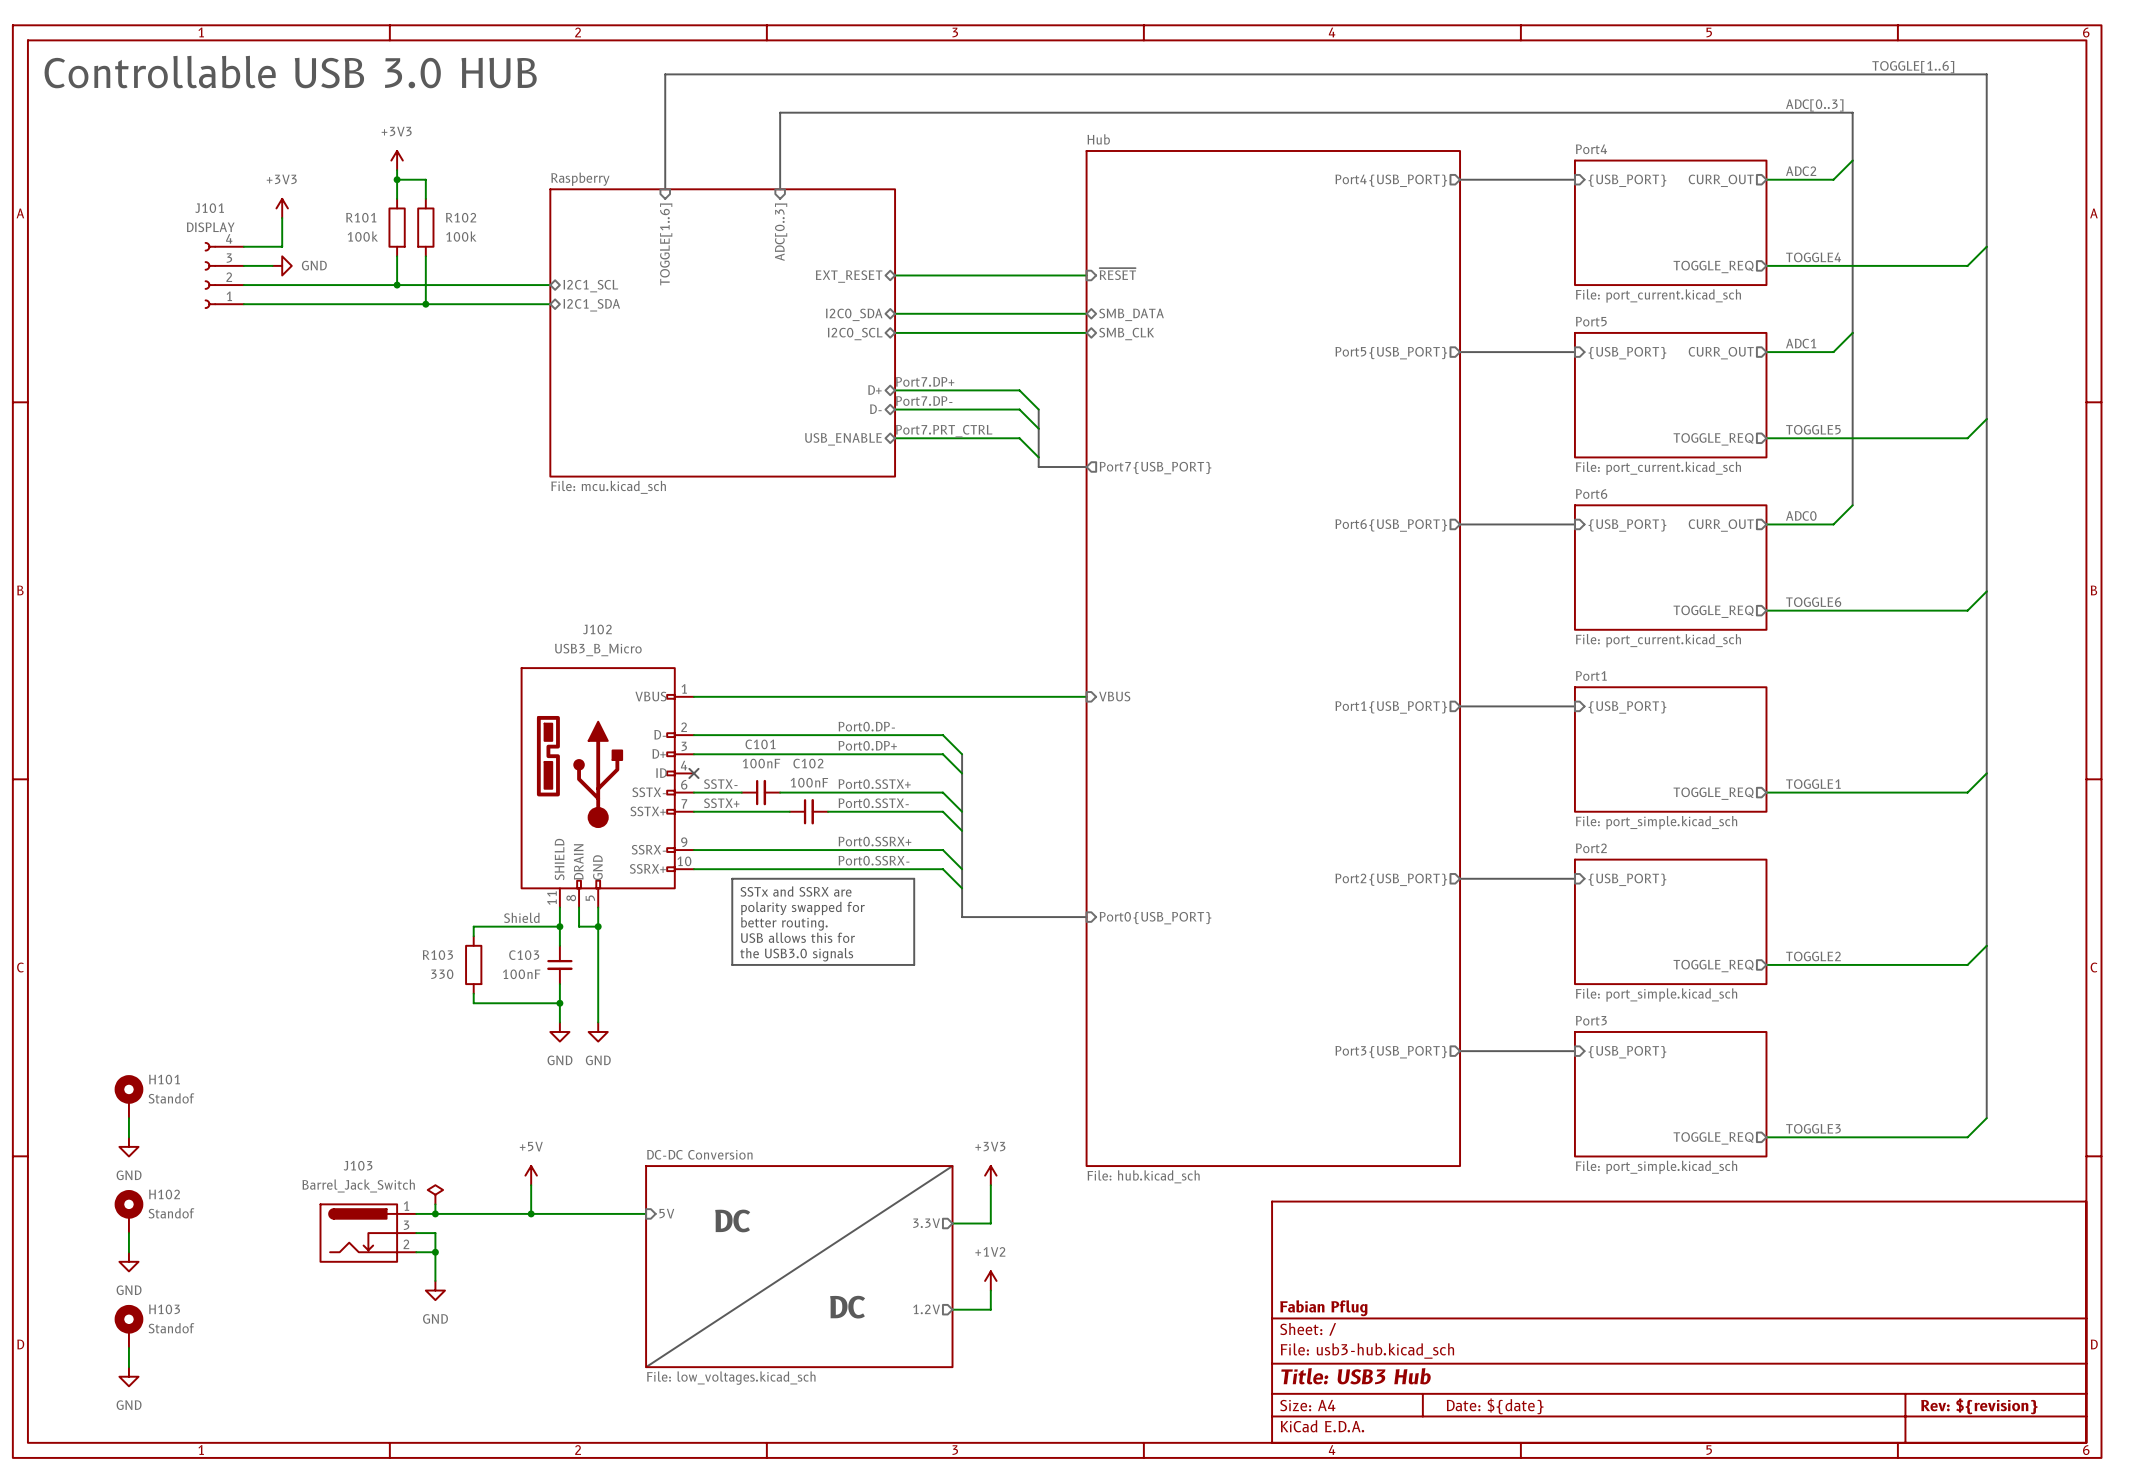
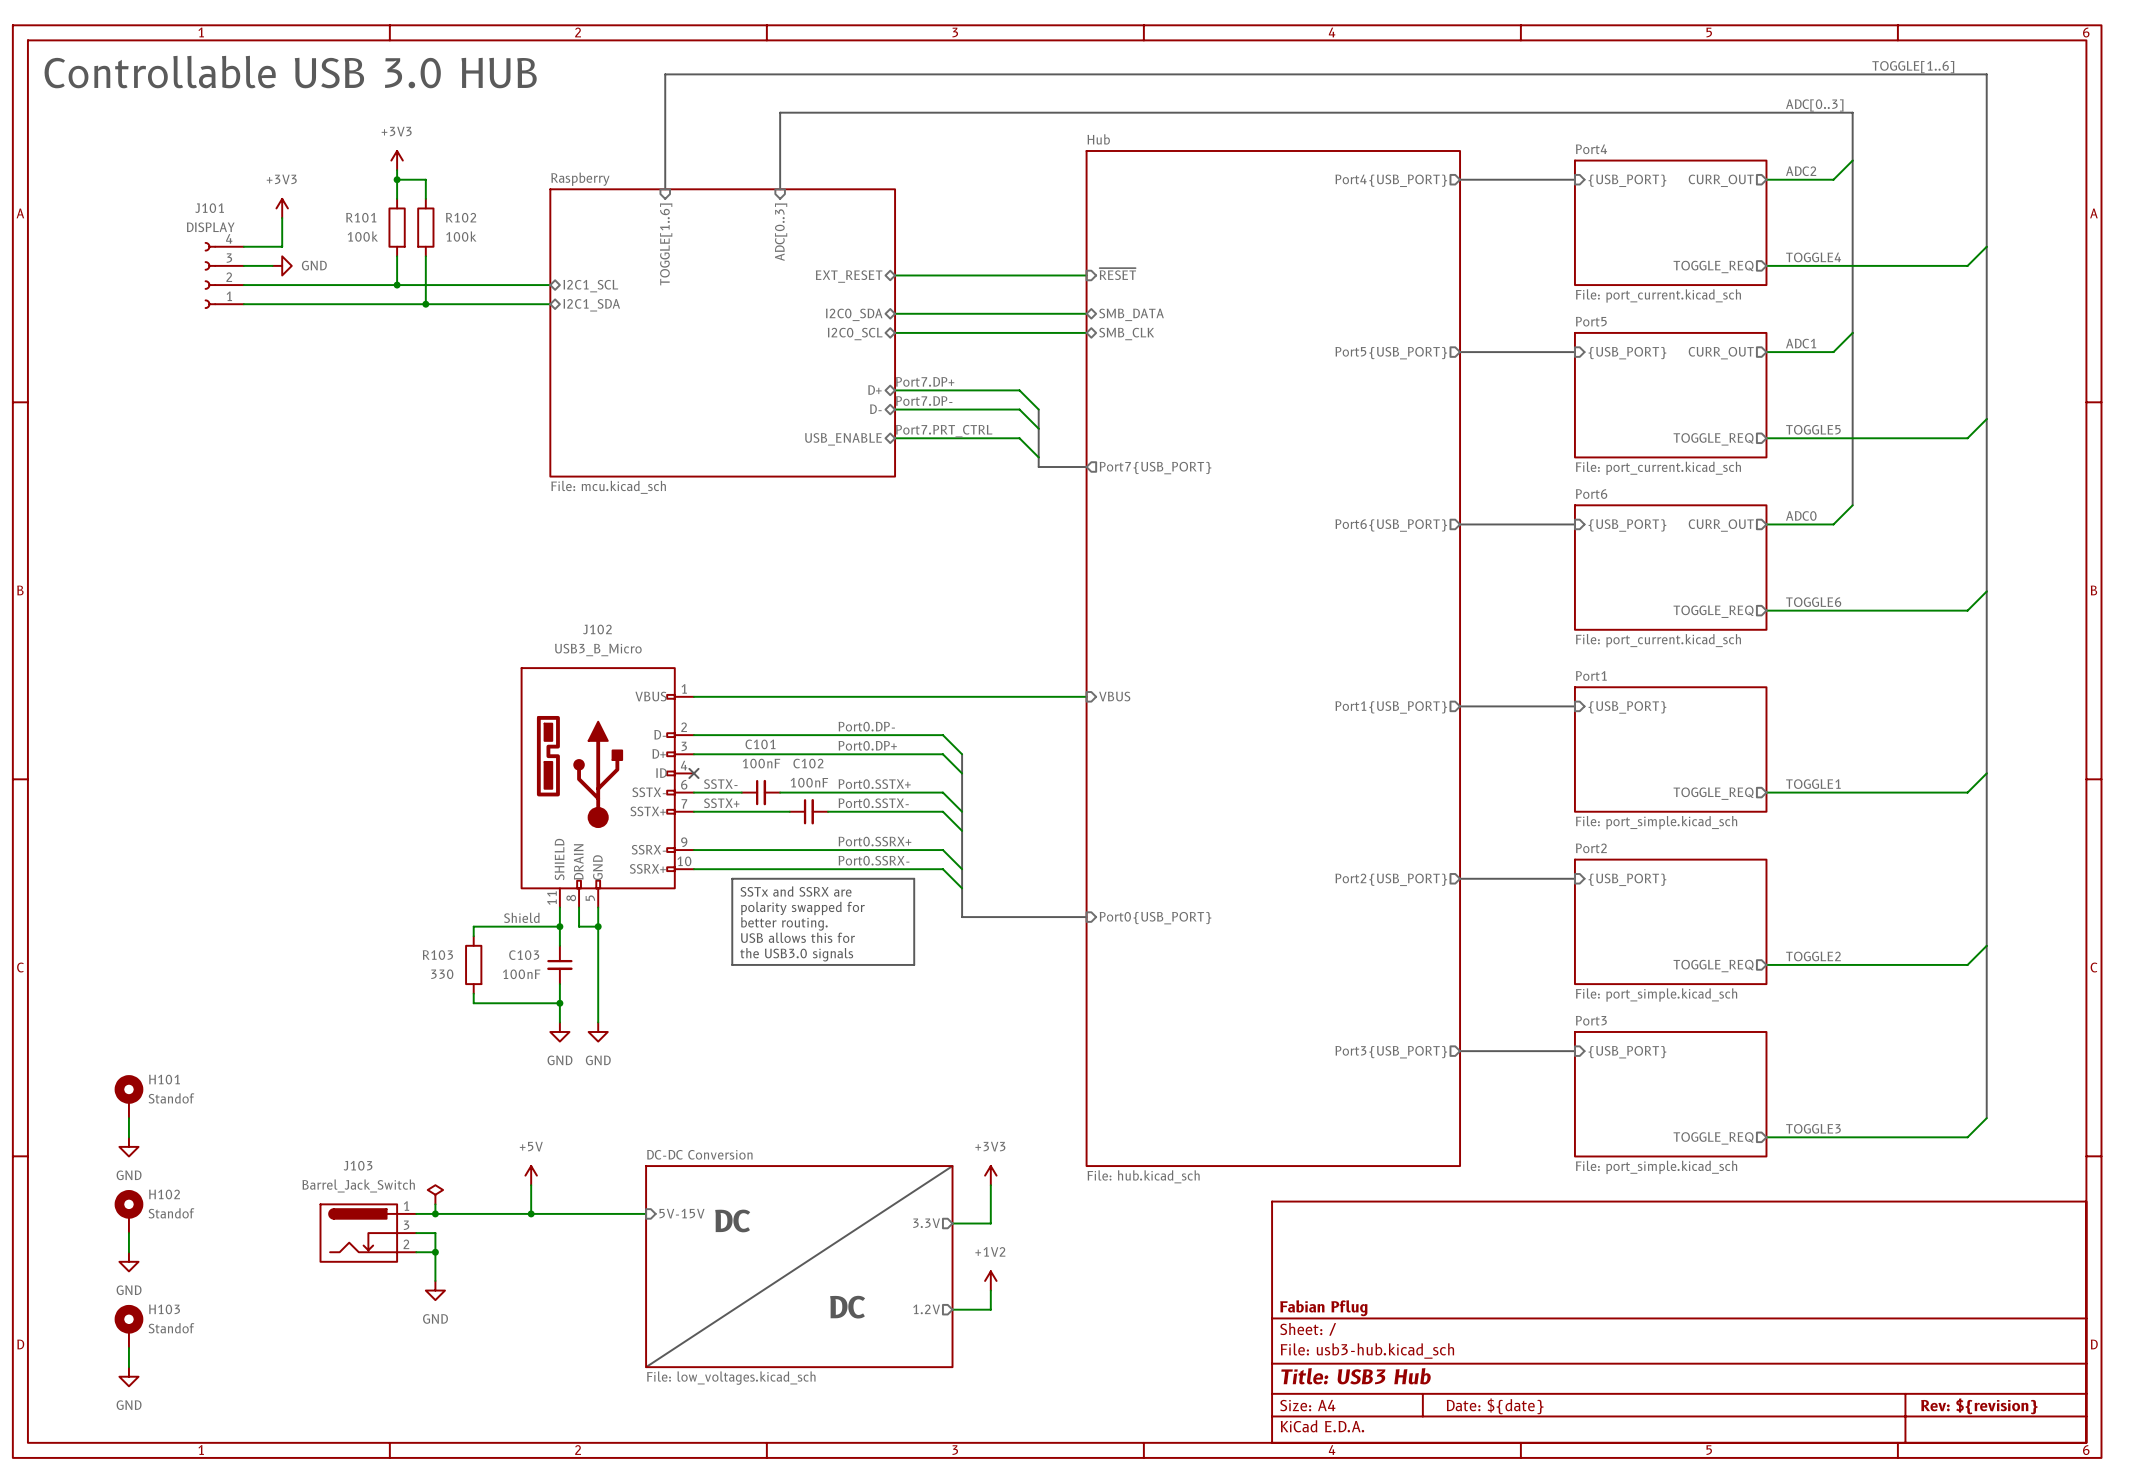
sheet pin: 5V (666, 1213) -> 5V-15V (681, 1213)

